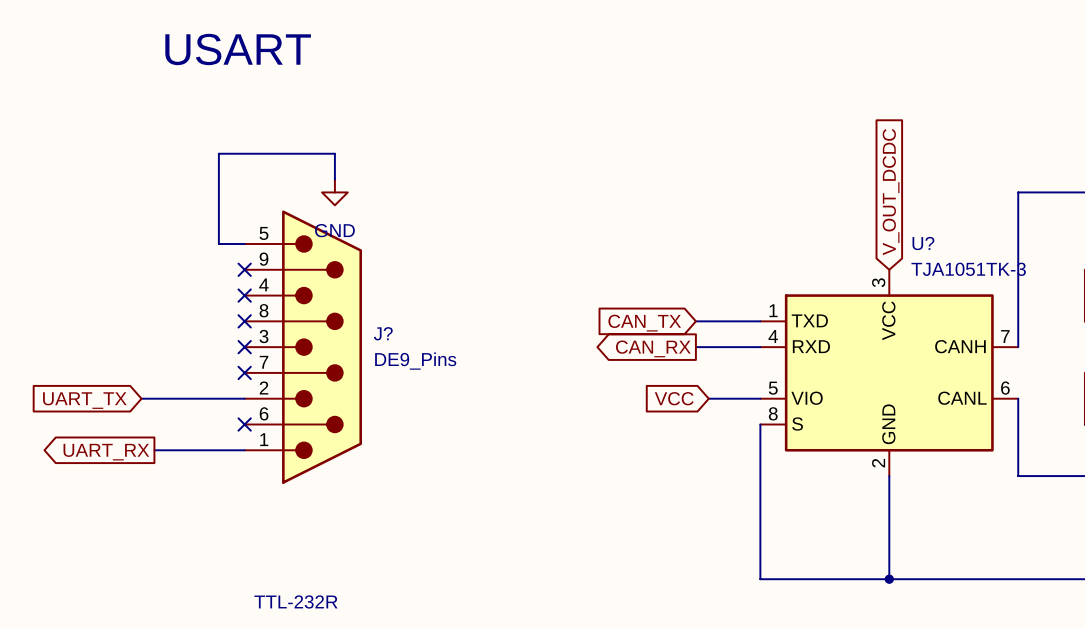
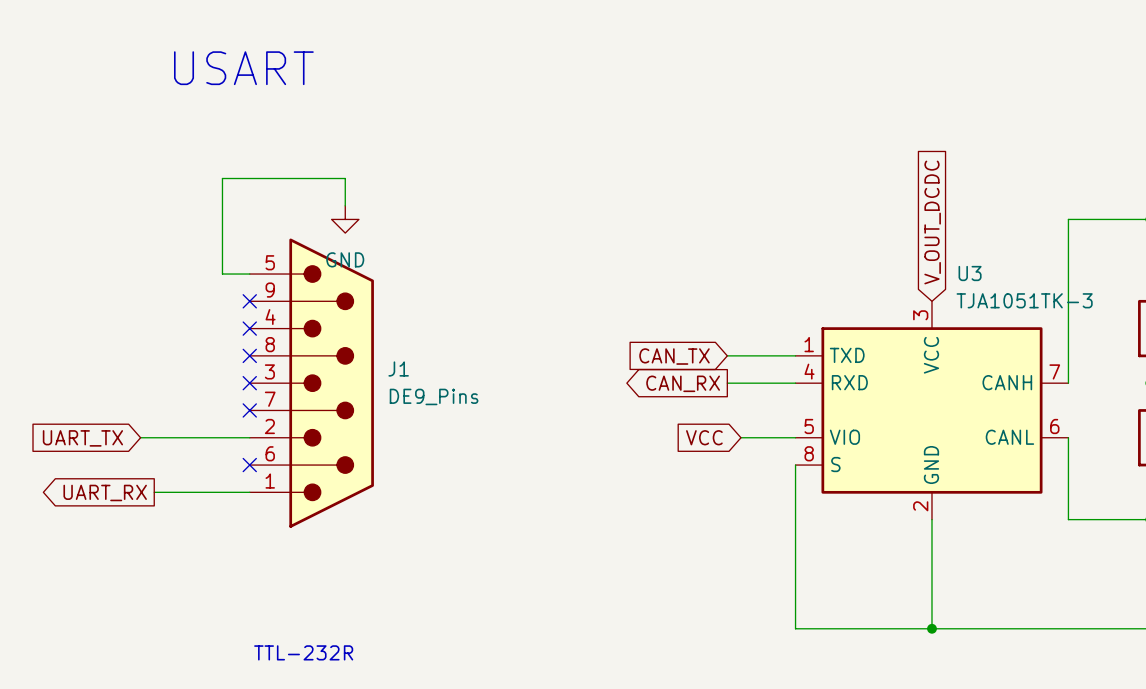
U? name: U? (923, 243) -> U3 (970, 273)
J? name: J? (383, 333) -> J1 (398, 369)

